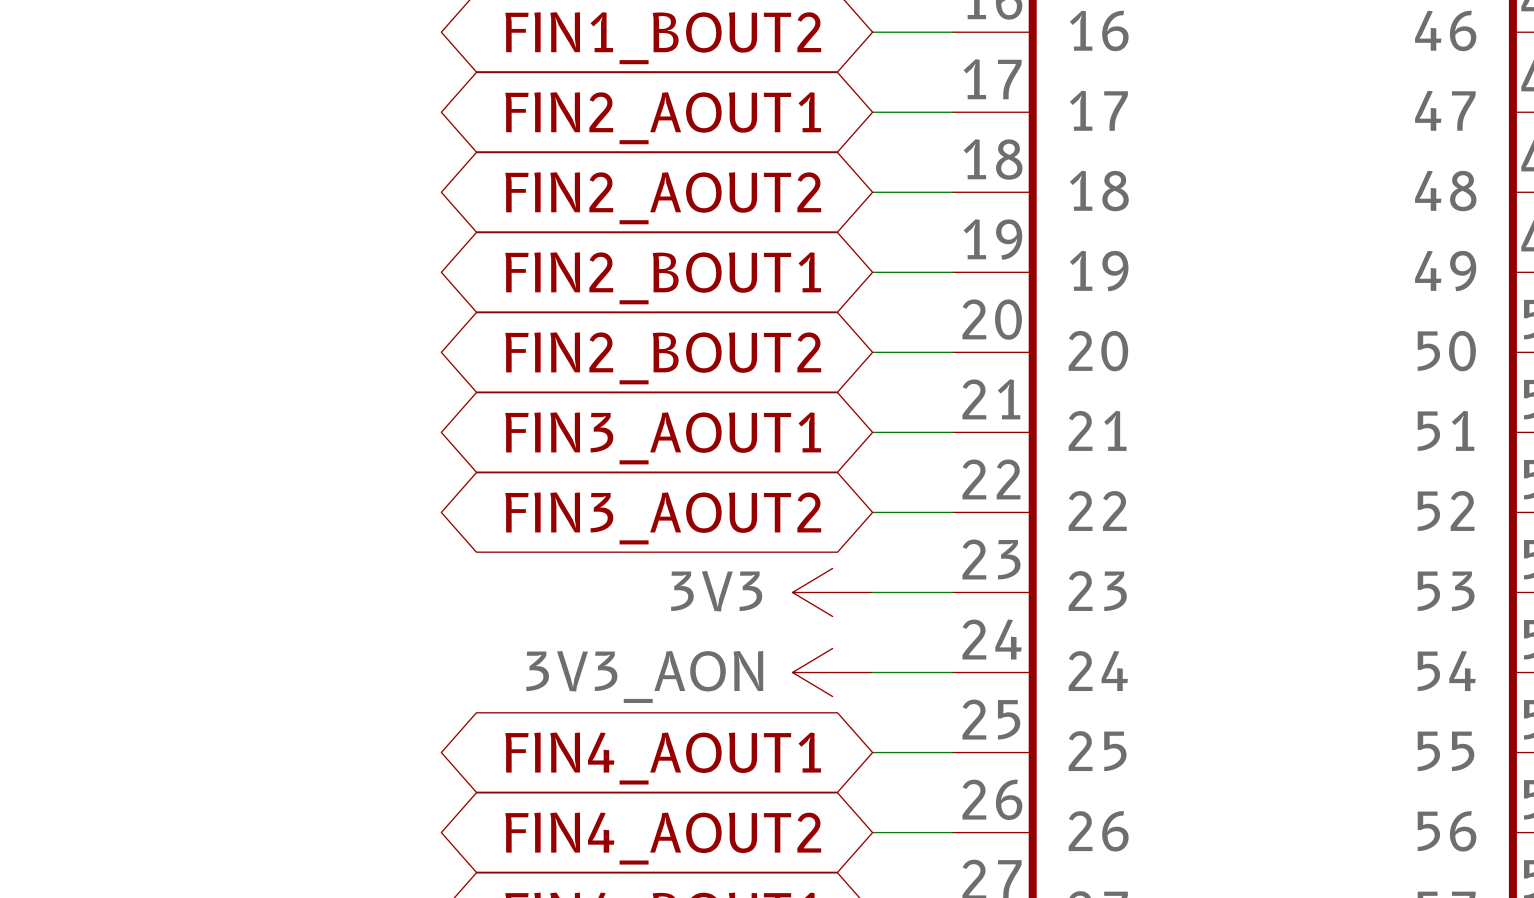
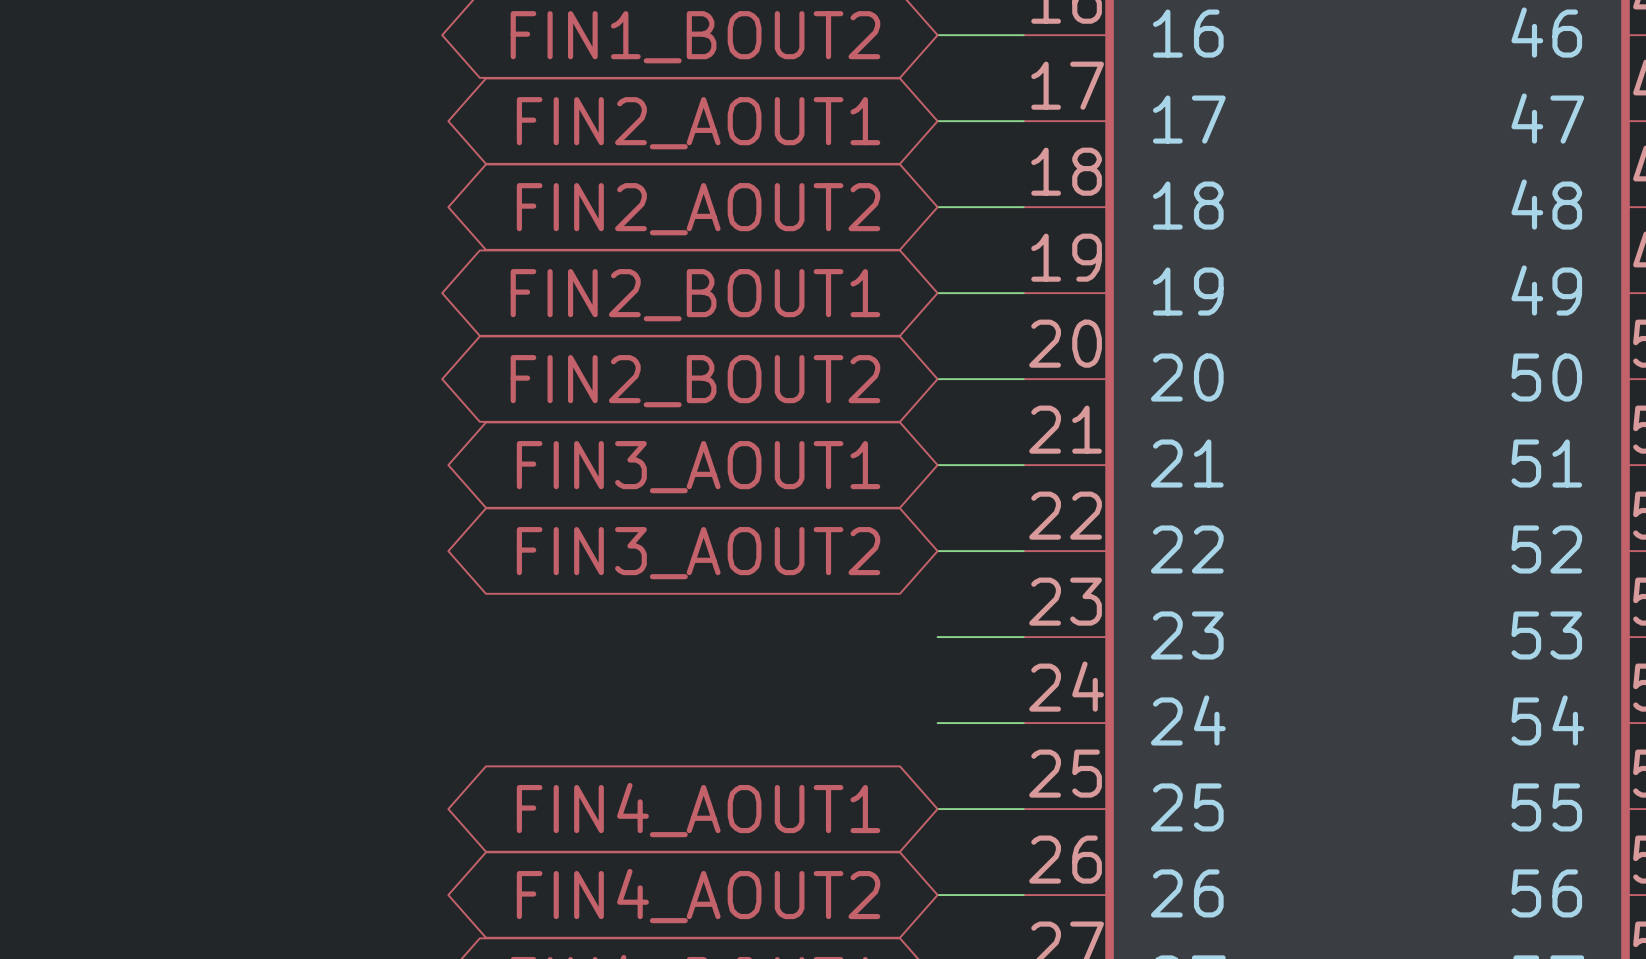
power symbol: 3V3 (832, 592) -> none
power symbol: 3V3_AON (832, 672) -> none

